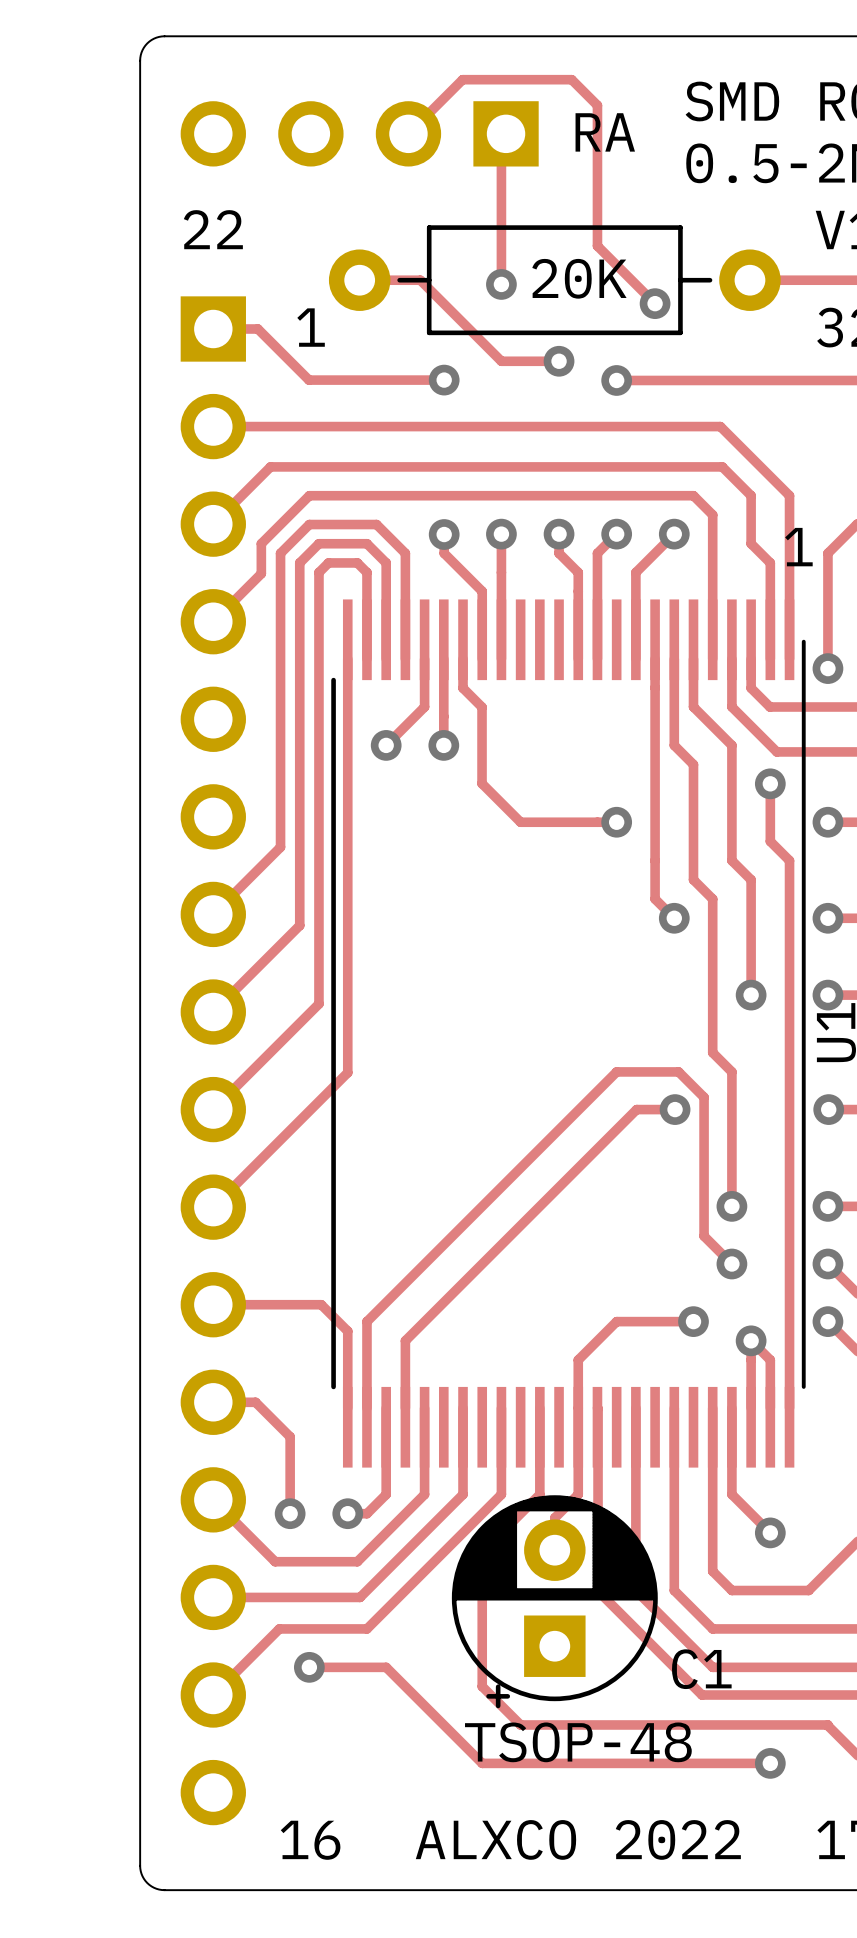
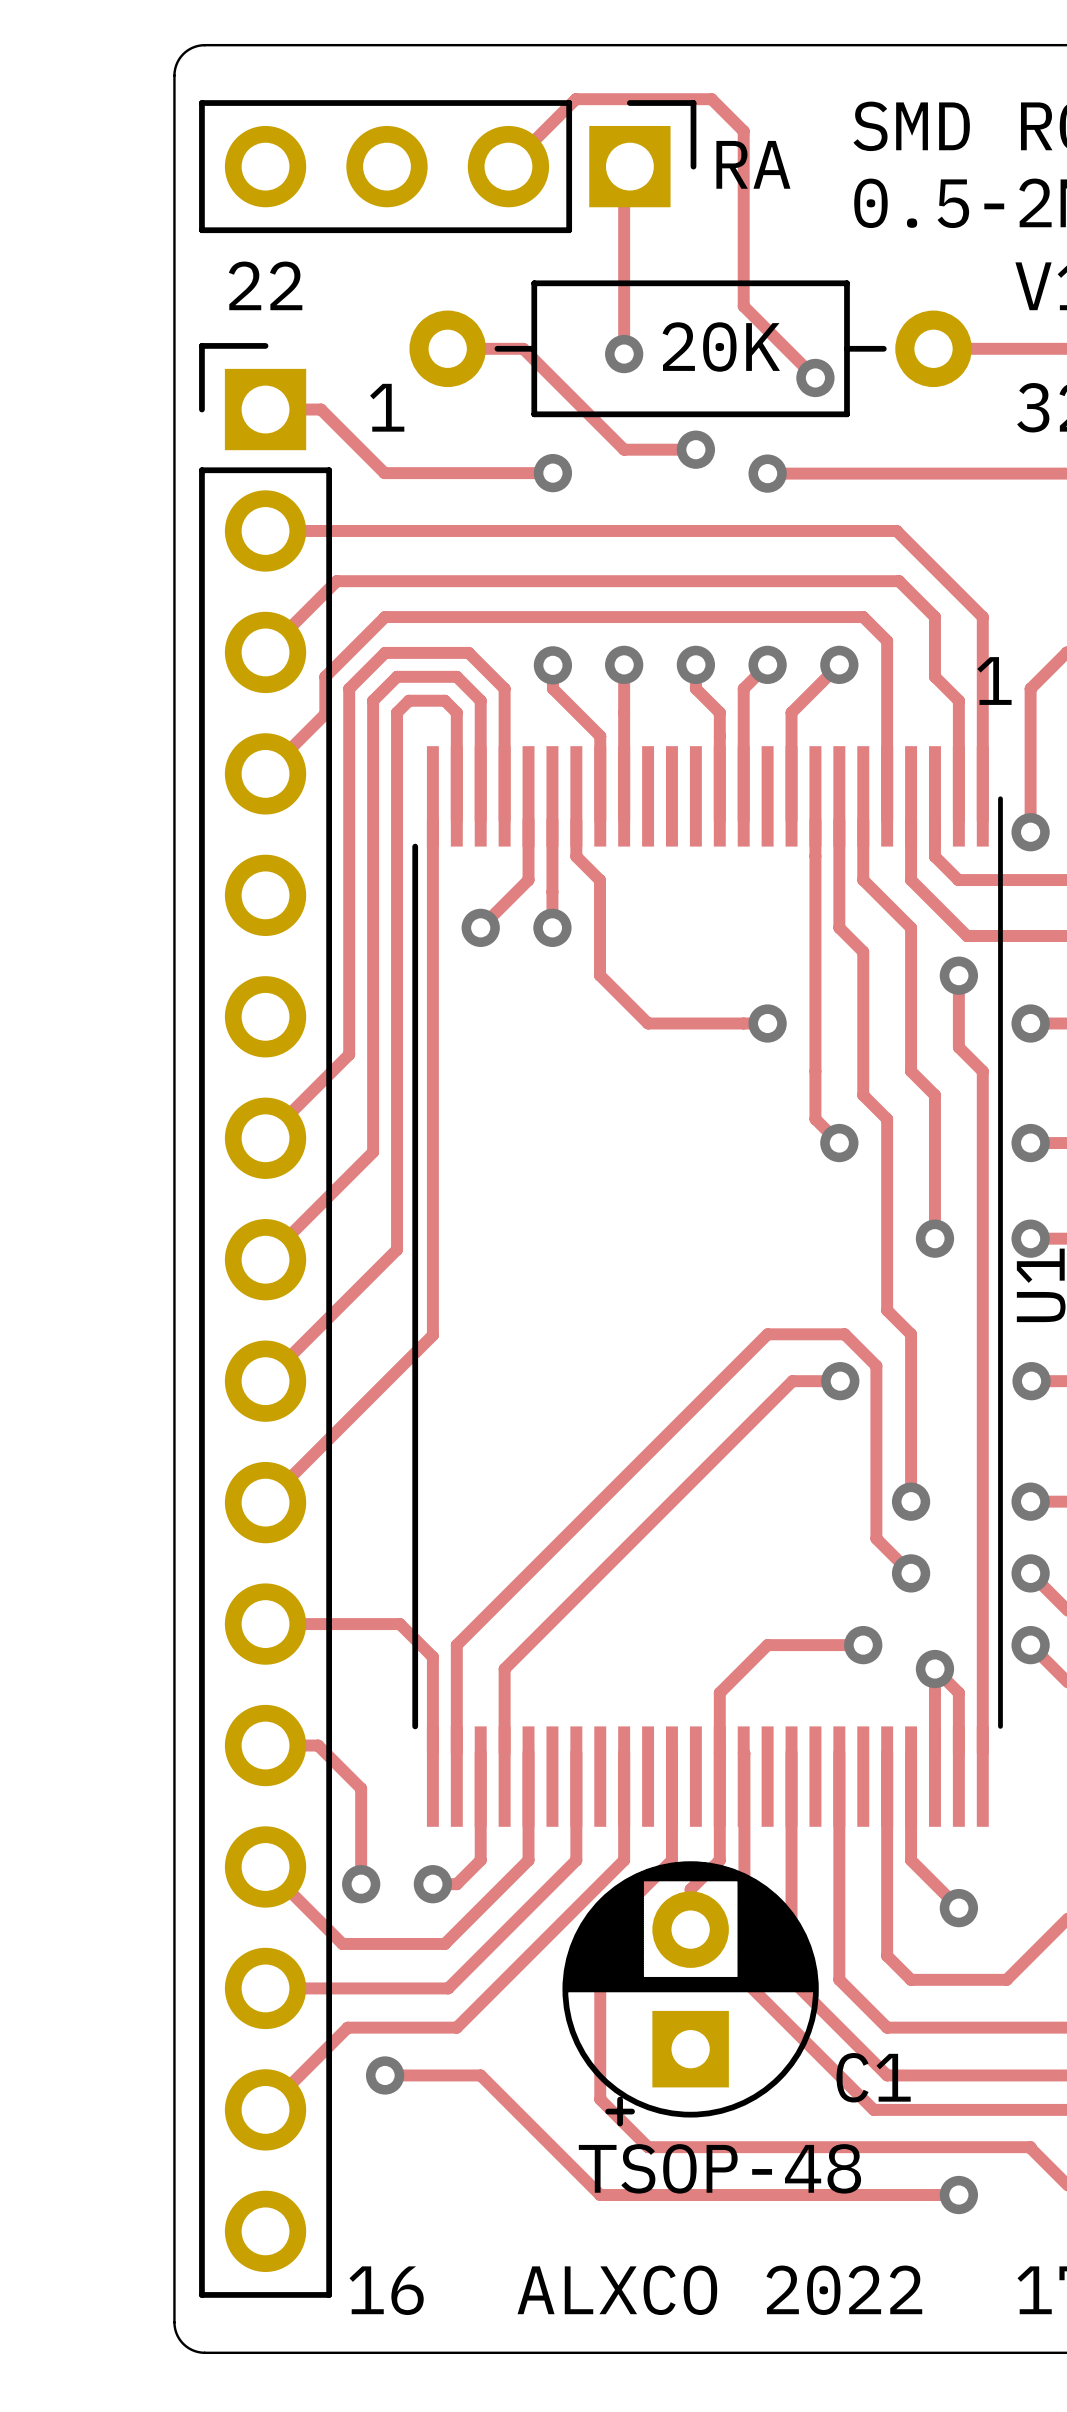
part side: bottom (359, 133) -> top (447, 166)
part side: bottom (213, 1060) -> top (265, 1320)

